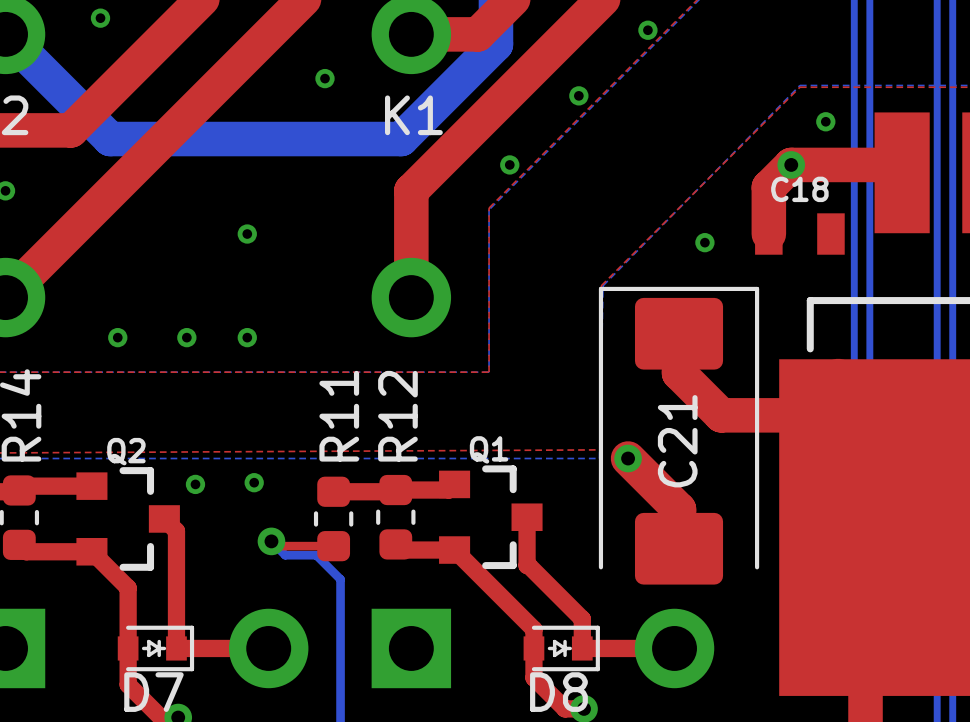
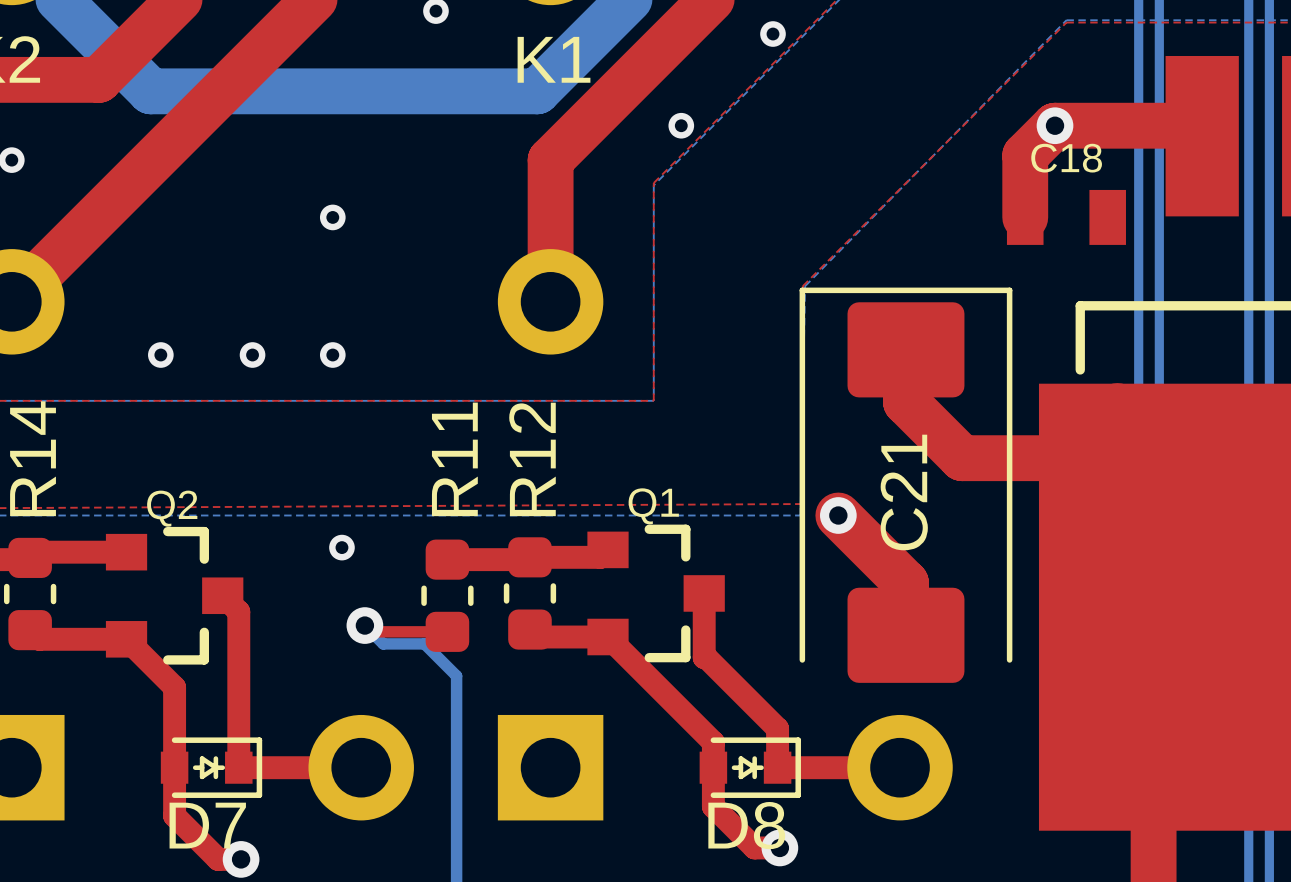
via: (825, 121) -> none
via: (704, 242) -> none
via: (195, 484) -> none

